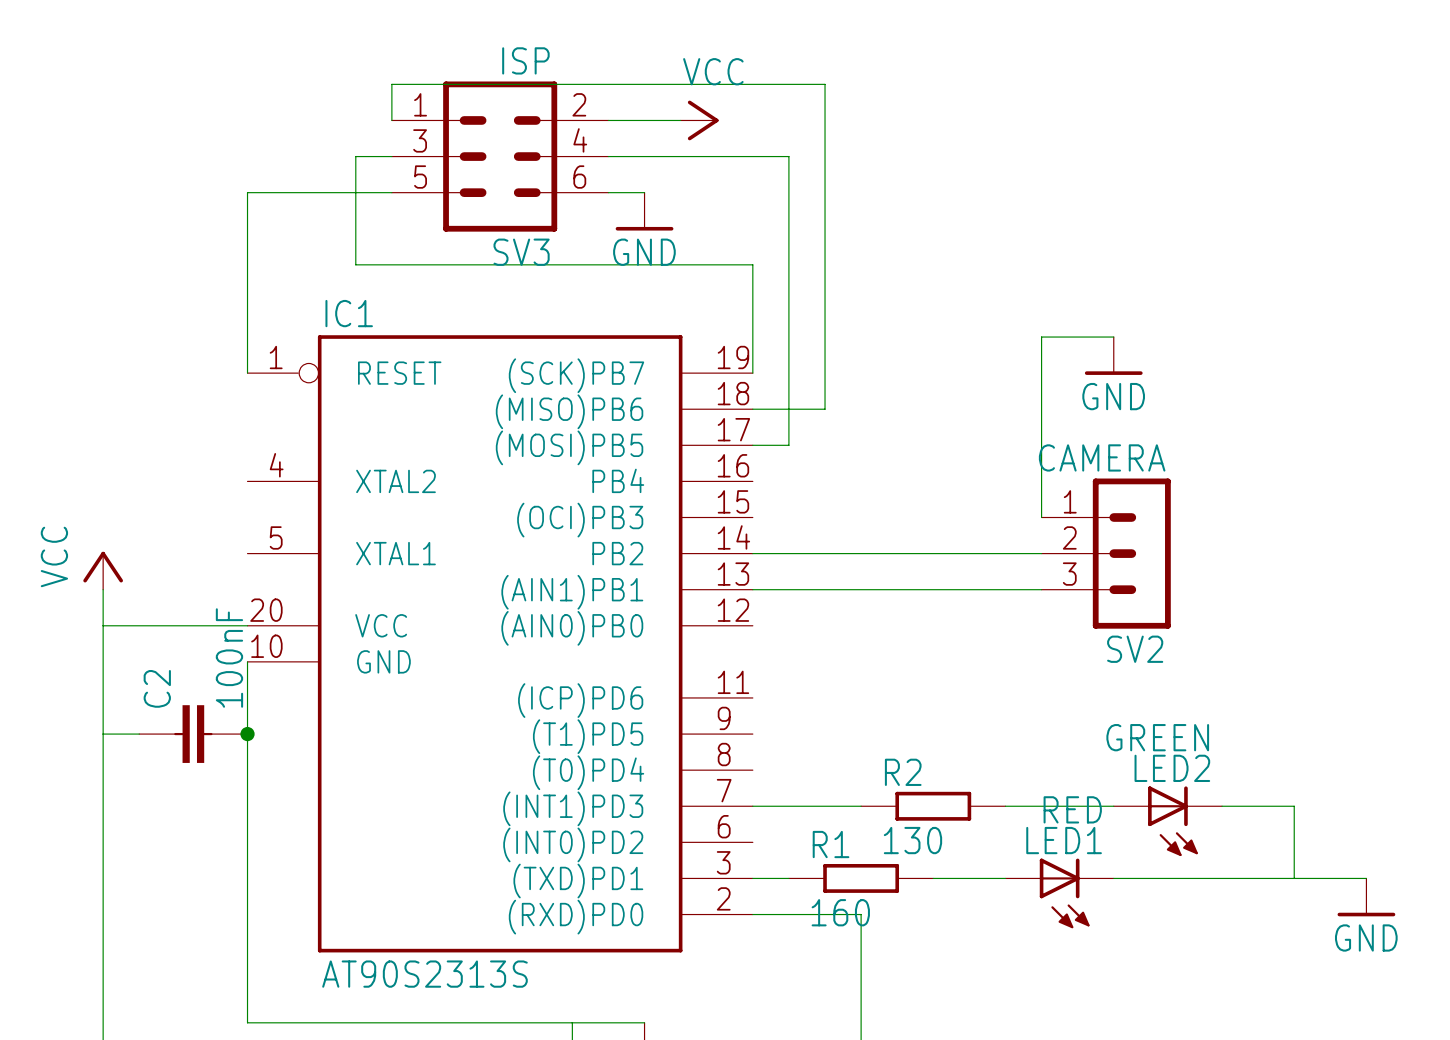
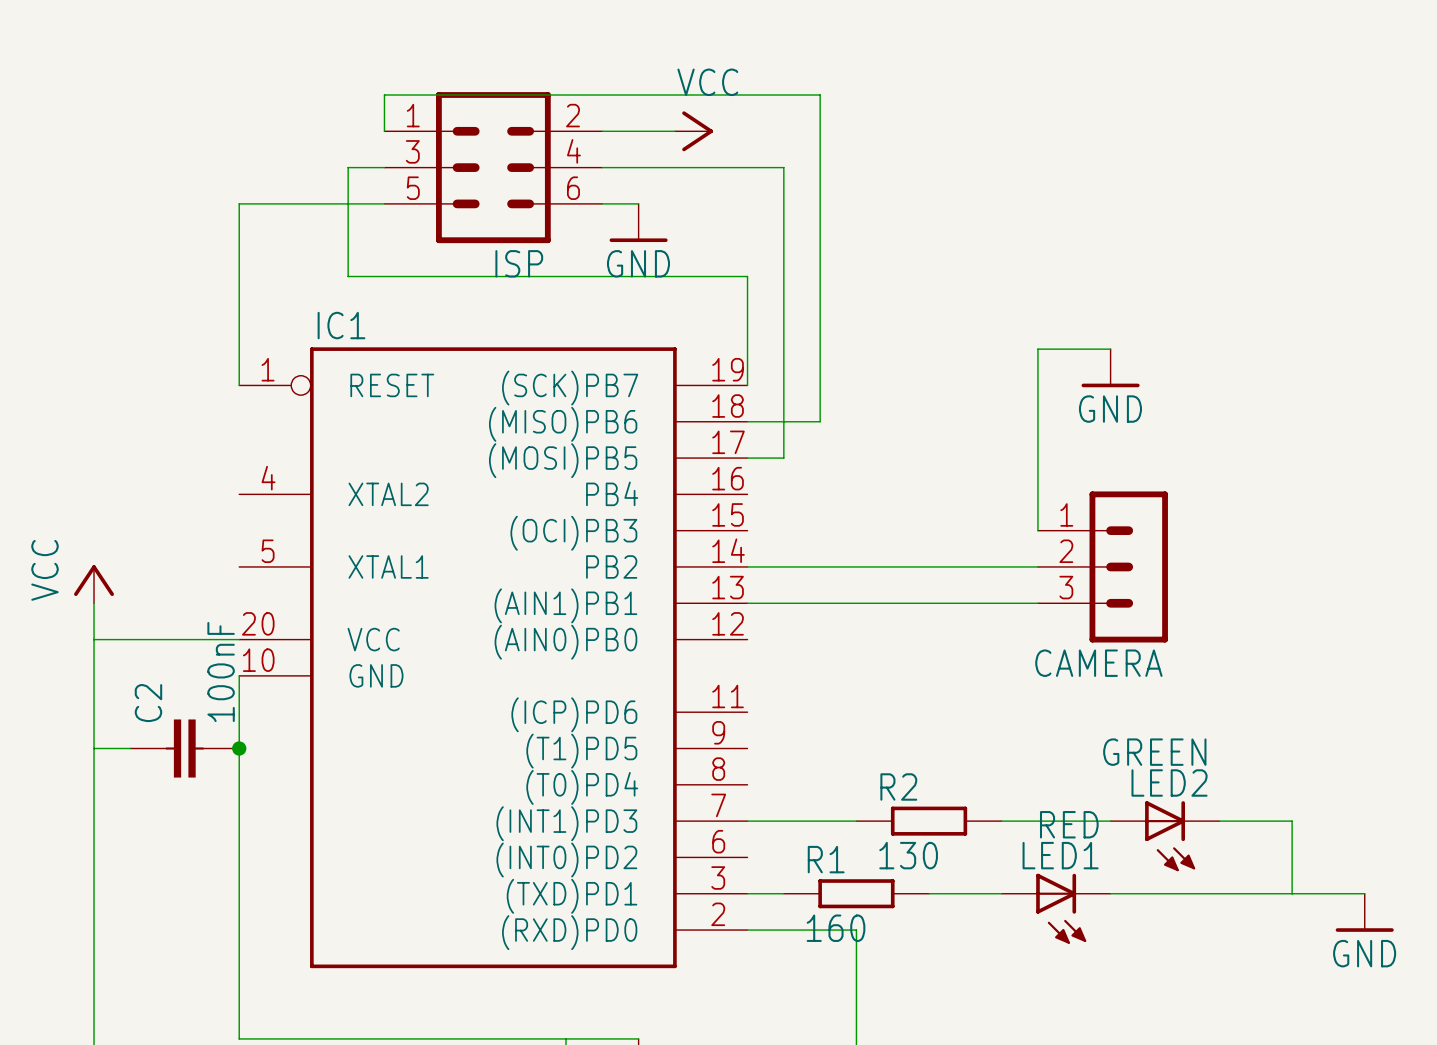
SV3 value: ISP (525, 60) -> none
SV3 name: SV3 (521, 252) -> ISP (519, 263)
SV2 value: CAMERA (1102, 457) -> none
SV2 name: SV2 (1135, 649) -> CAMERA (1098, 663)
IC1 value: AT90S2313S (424, 974) -> none

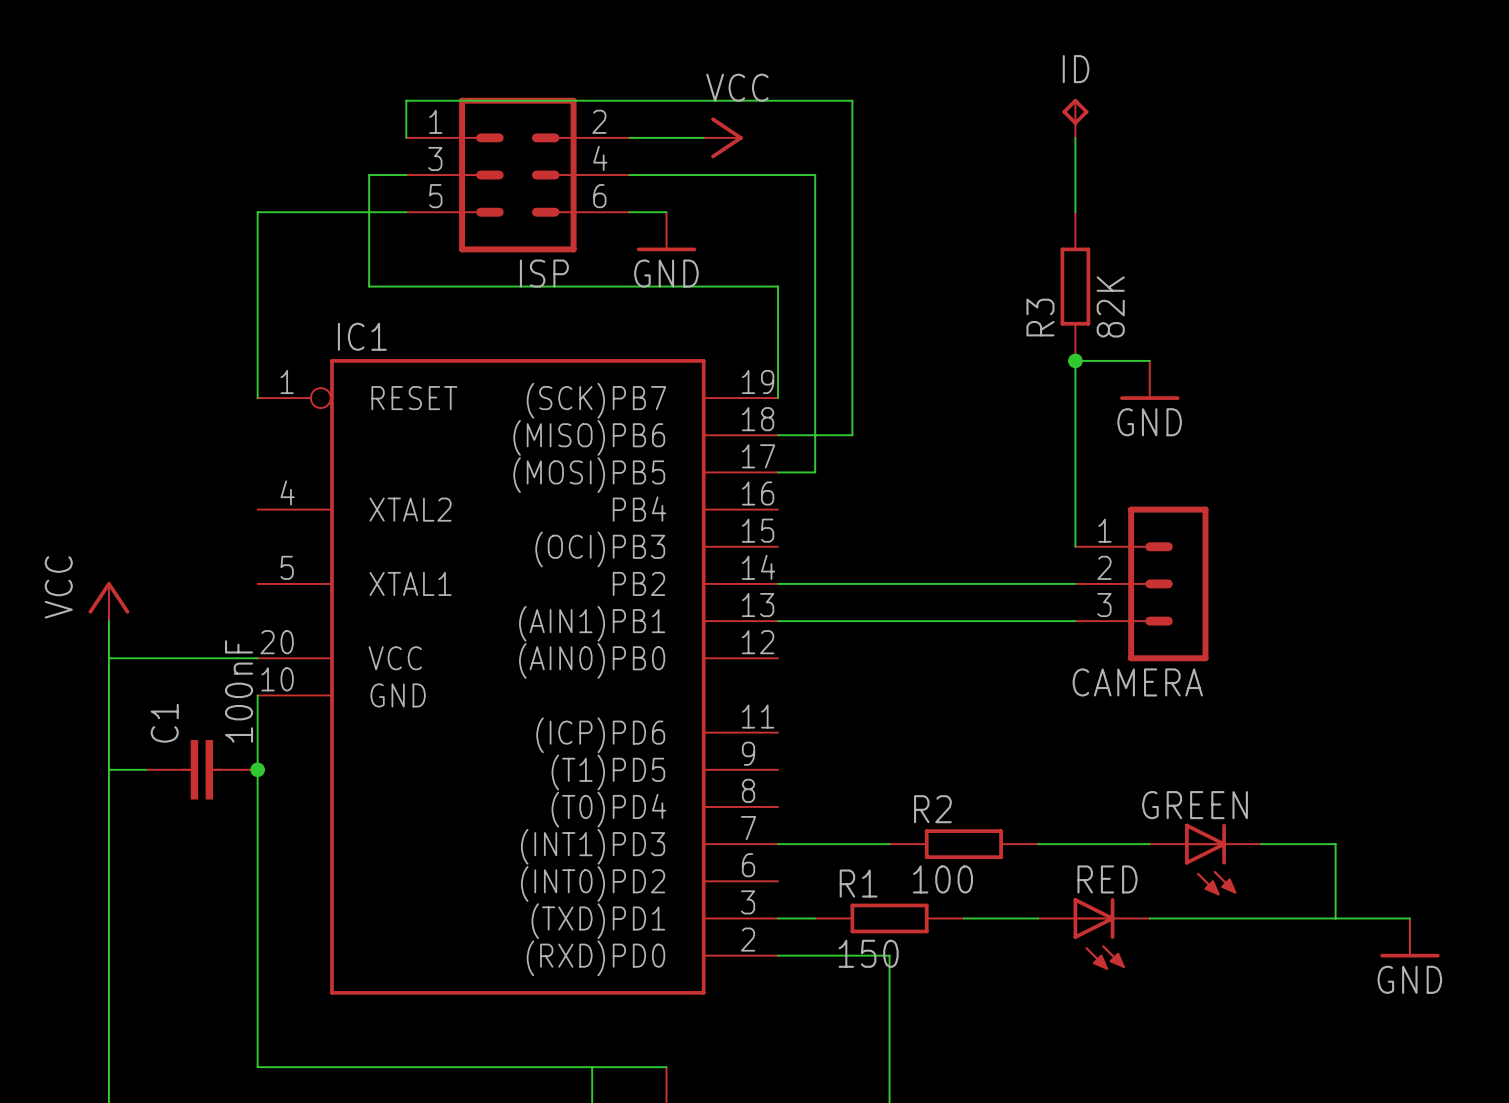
ID: none -> (1075, 118)
wire: none -> (1075, 137) (1075, 212)
R3: none -> 82K (1075, 286)
junction: none -> (1075, 360)
C2 name: C2 (148, 703) -> C1 (164, 723)
LED2 value: GREEN (1154, 752) -> none
LED2 name: LED2 (1169, 783) -> GREEN (1195, 805)
LED1 value: RED (1069, 824) -> none
R2 value: 130 (908, 855) -> 100 (942, 879)
LED1 name: LED1 (1060, 855) -> RED (1107, 879)
R1 value: 160 (835, 928) -> 150 (868, 953)

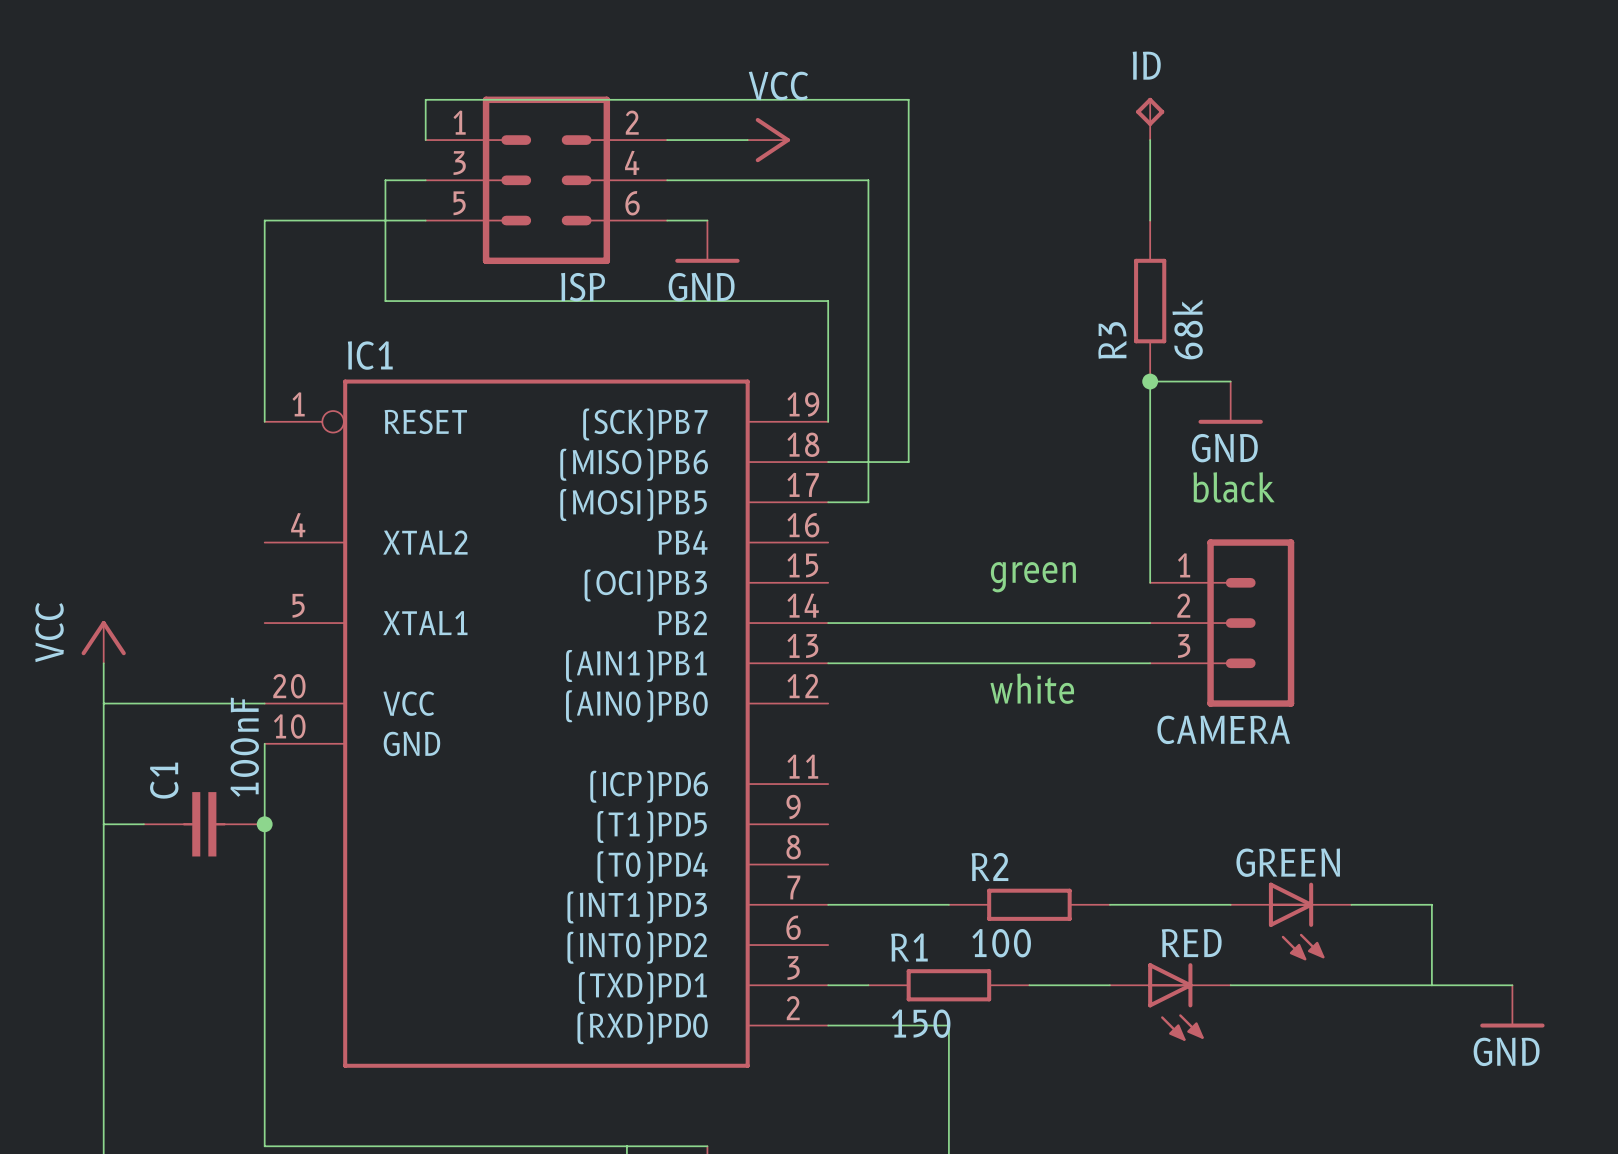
R3 value: 82K (1110, 306) -> 68k (1187, 329)
text: none -> black (1234, 487)
text: none -> green (1033, 577)
text: none -> white (1032, 688)

